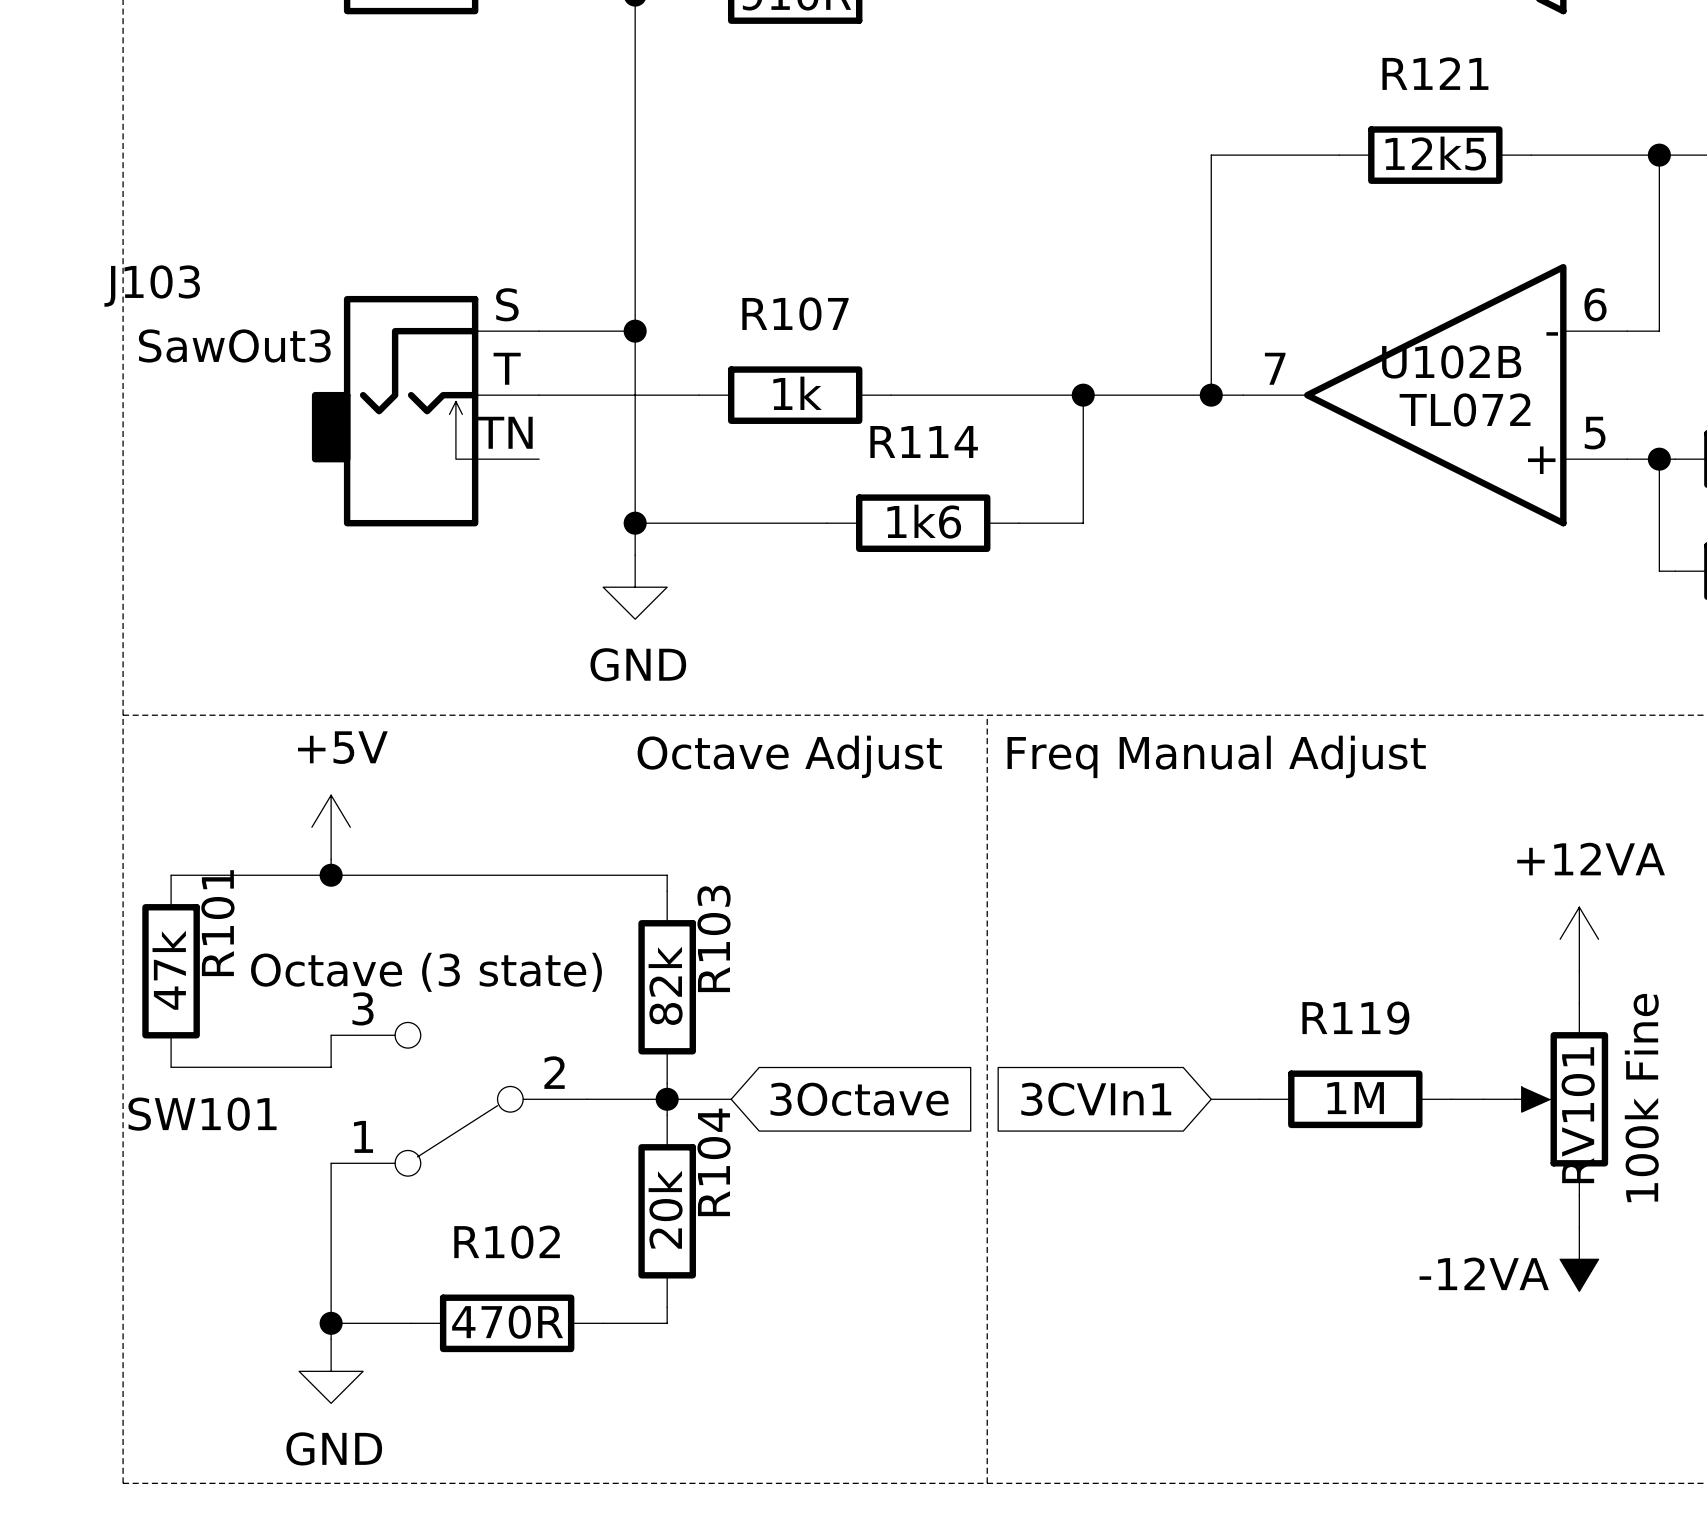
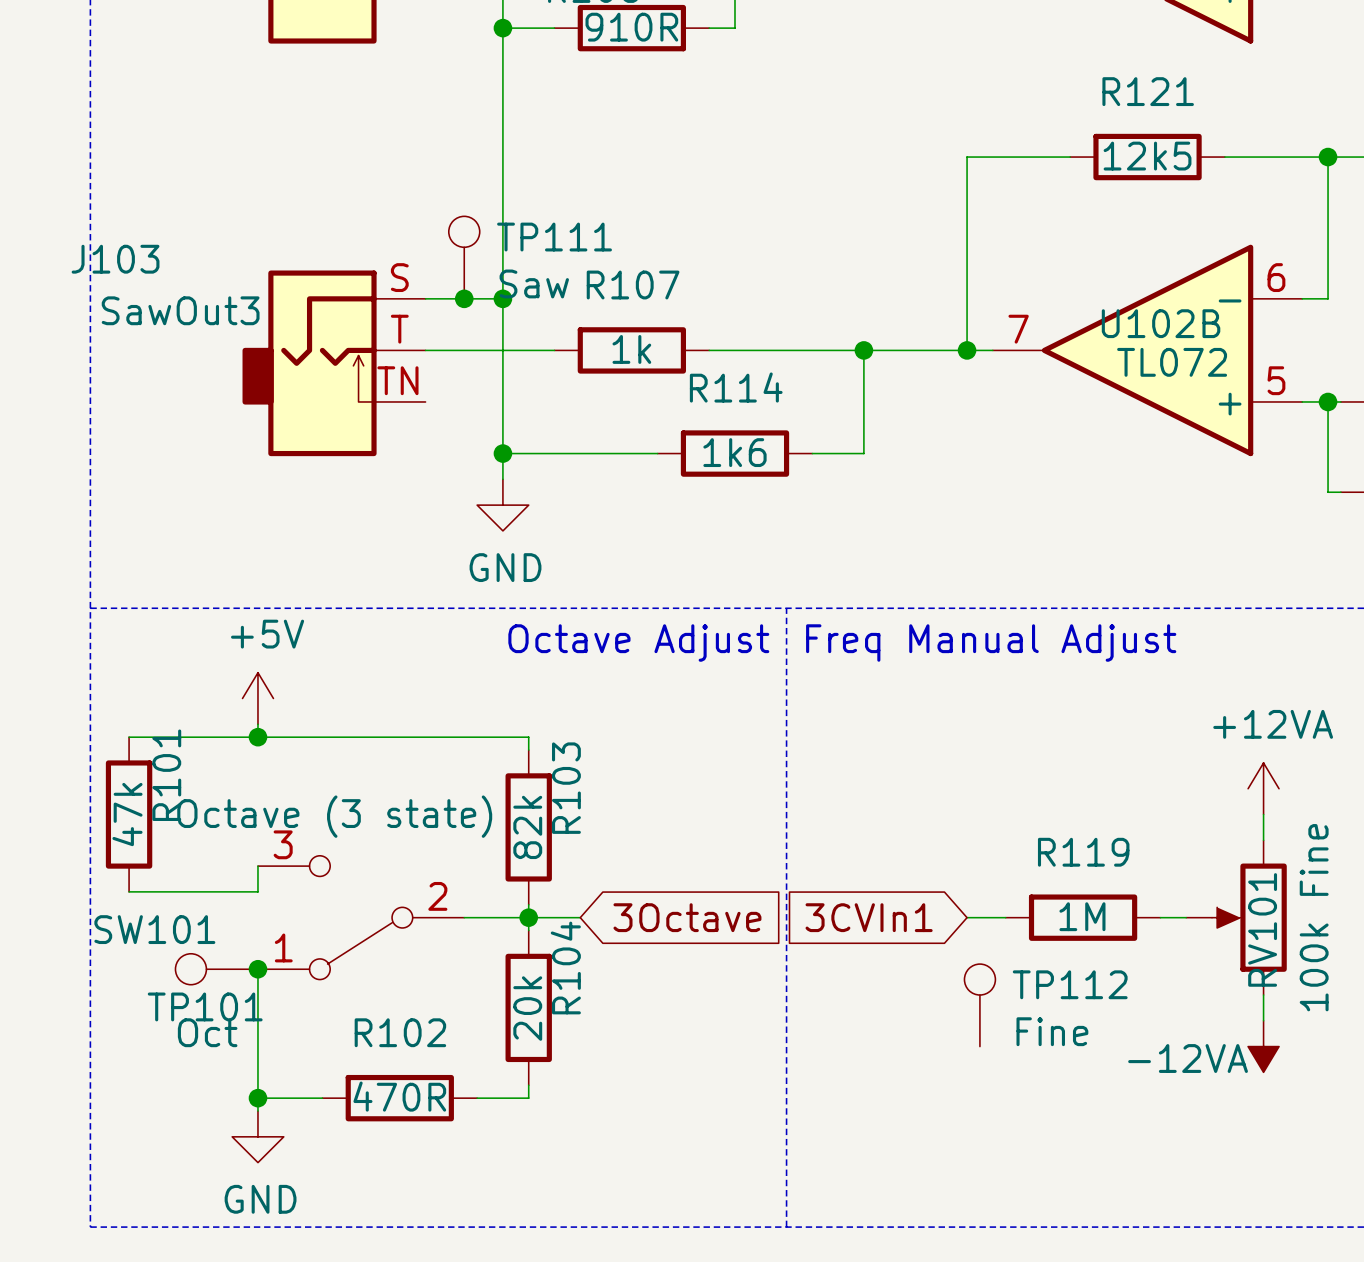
TP111: none -> Saw (464, 257)
junction: none -> (464, 298)
TP101: none -> Oct (216, 969)
junction: none -> (257, 969)
TP112: none -> Fine (979, 1005)

